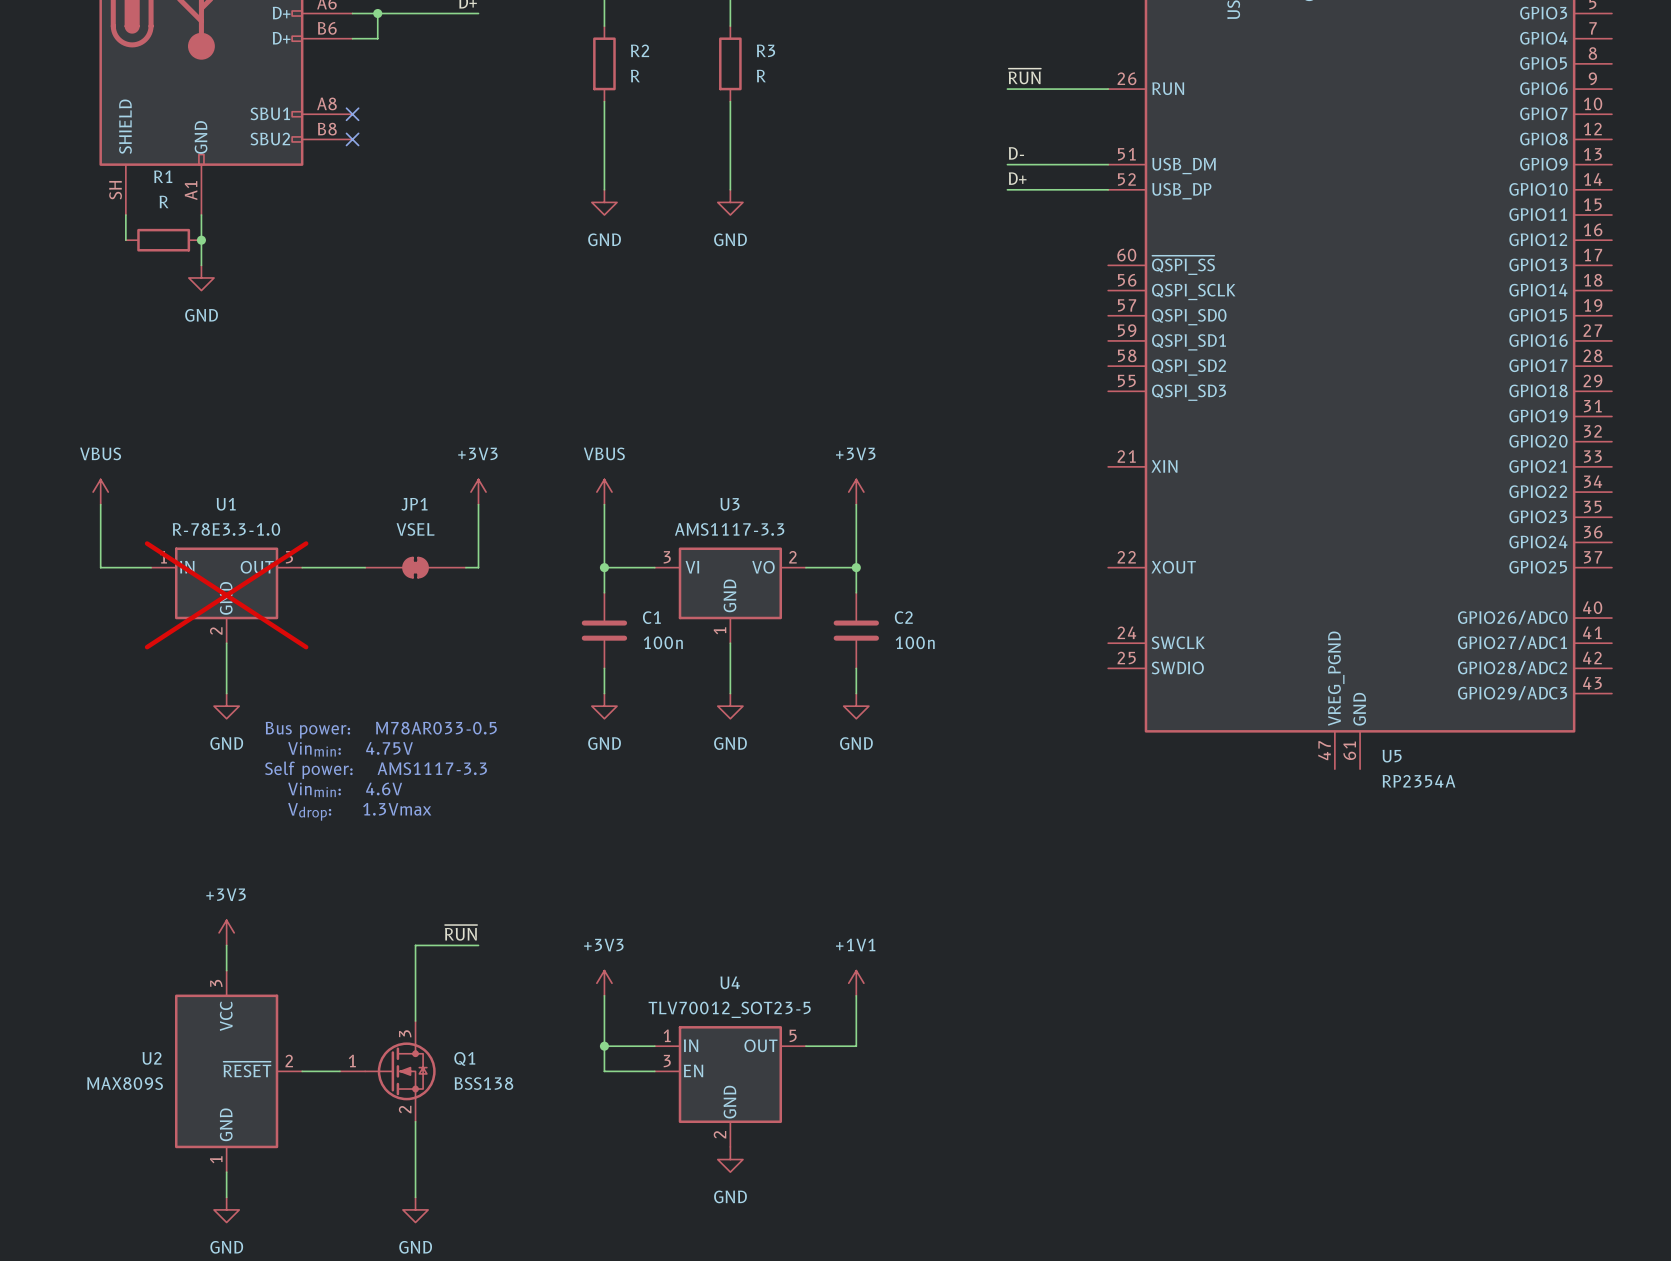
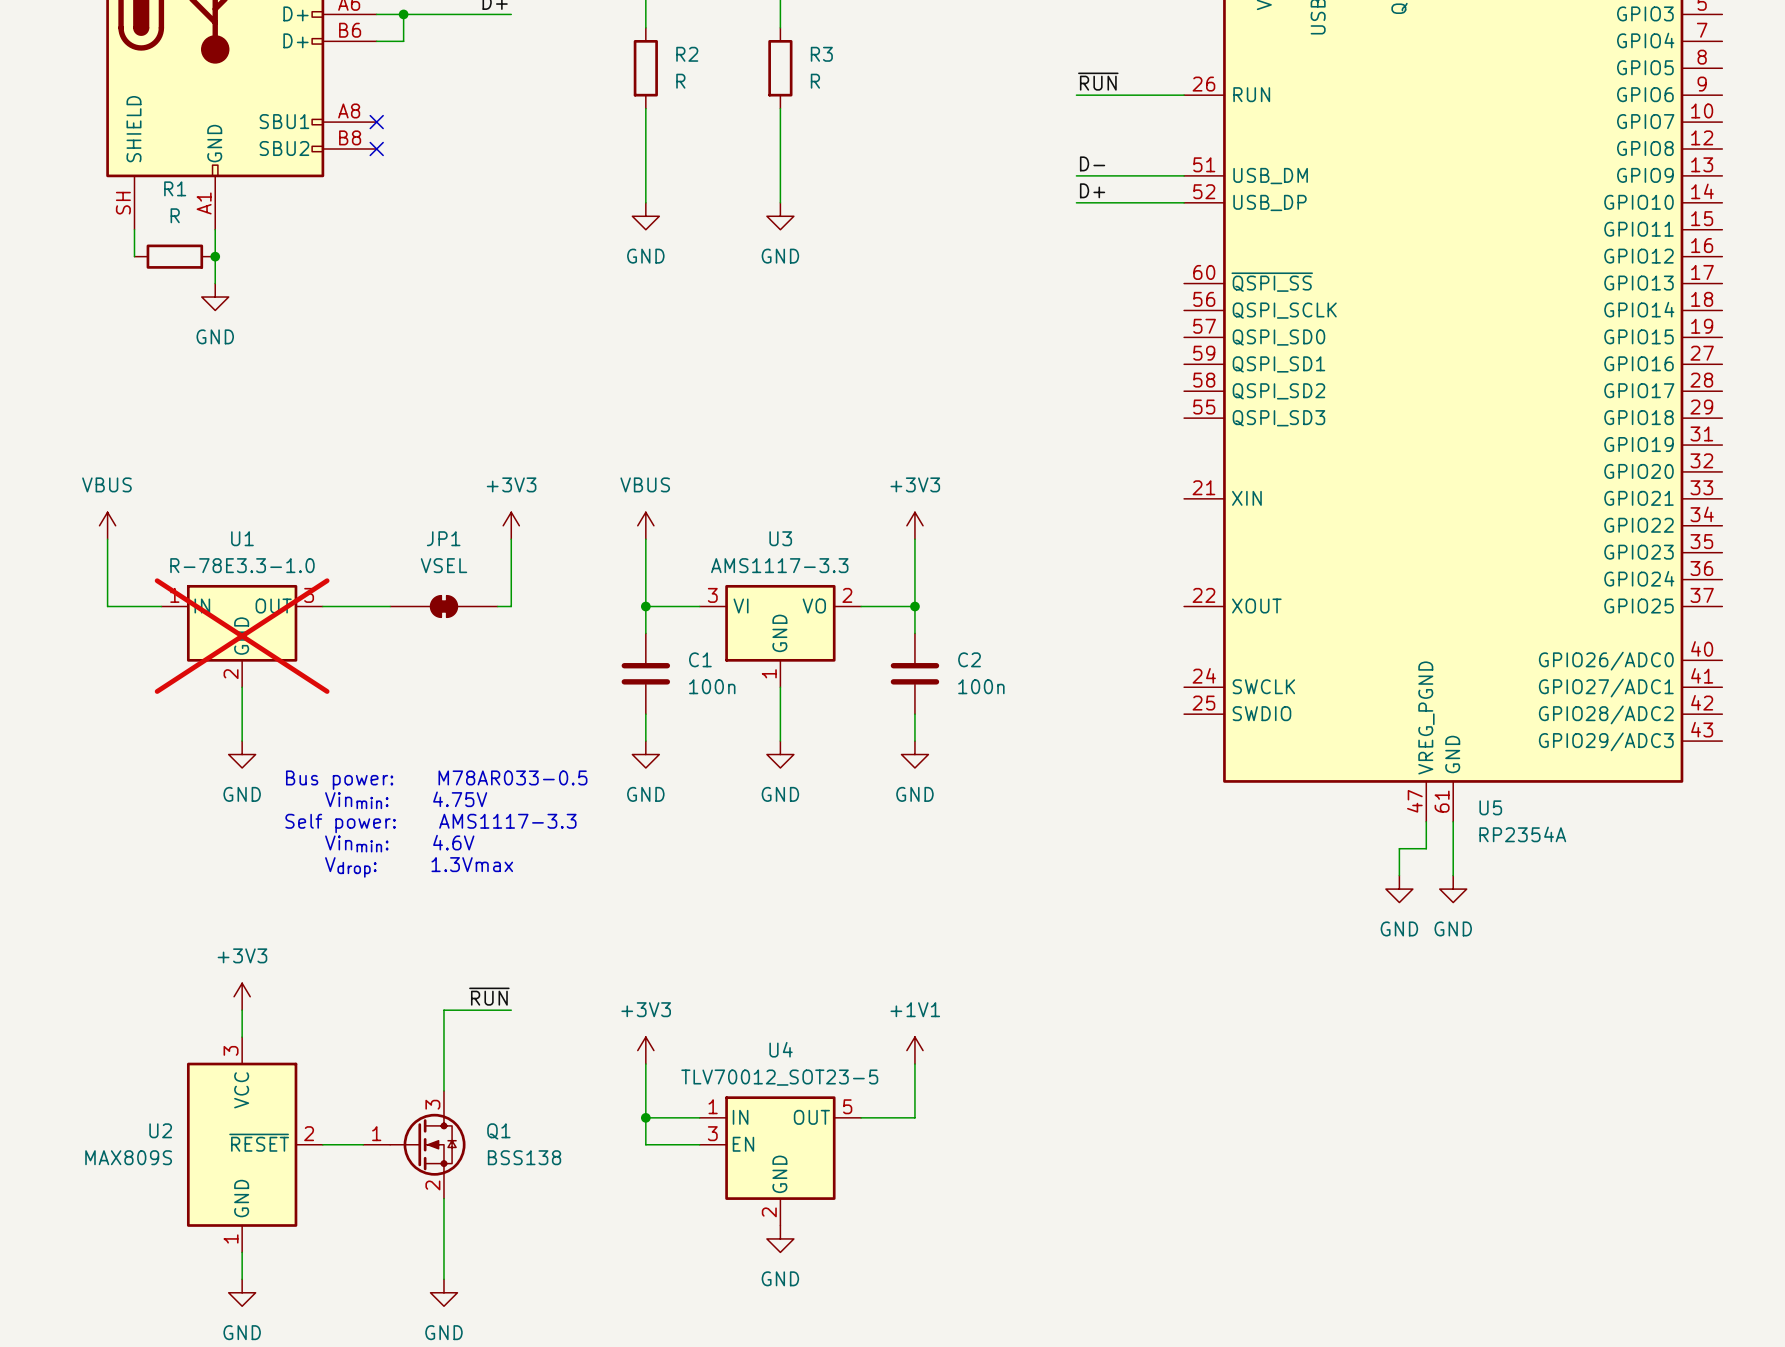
wire: none -> (1426, 821) (1426, 848) (1399, 848) (1399, 875)
wire: none -> (1453, 821) (1453, 875)
power symbol: none -> GND (1399, 889)
power symbol: none -> GND (1453, 889)

